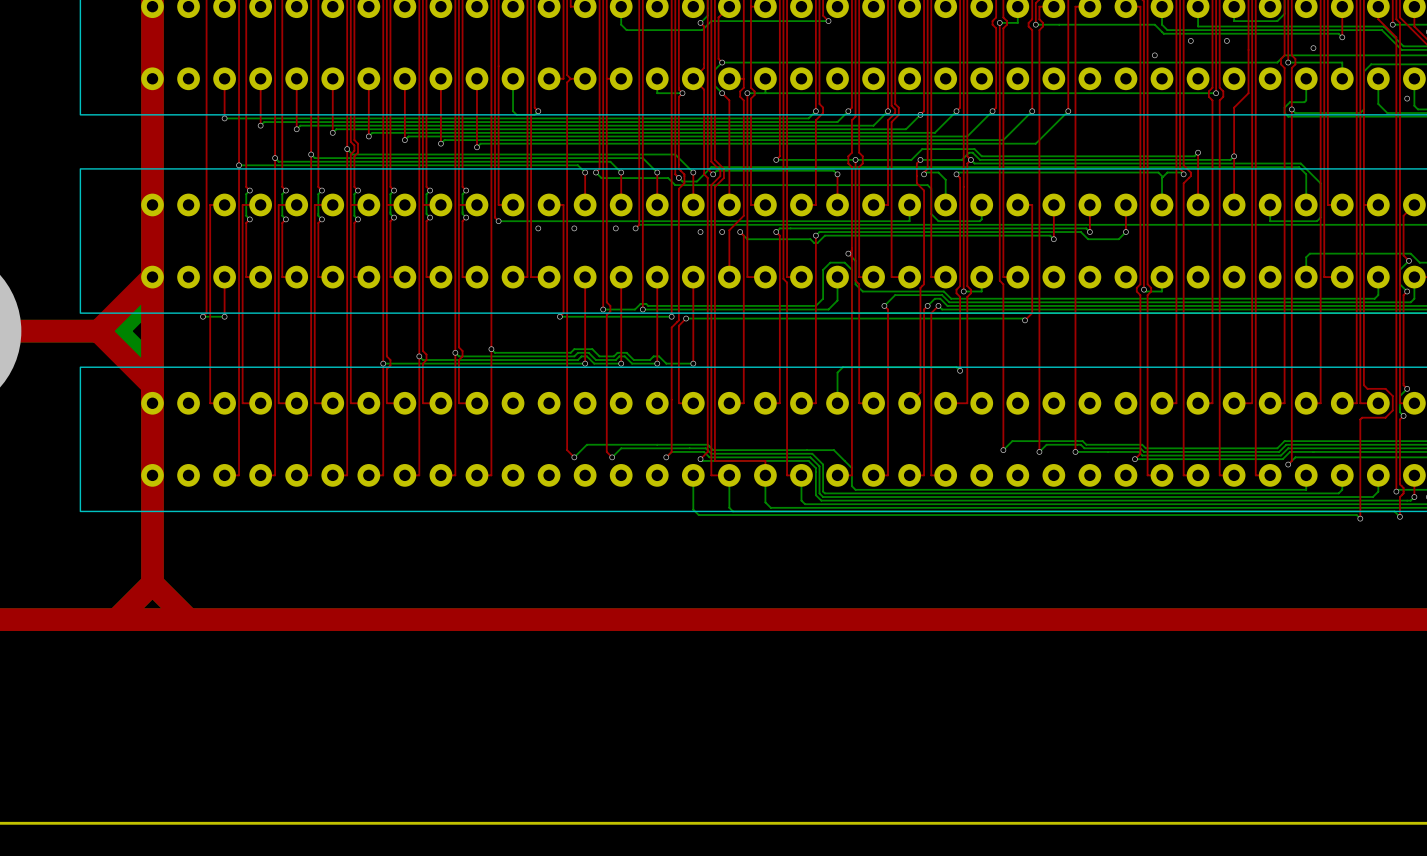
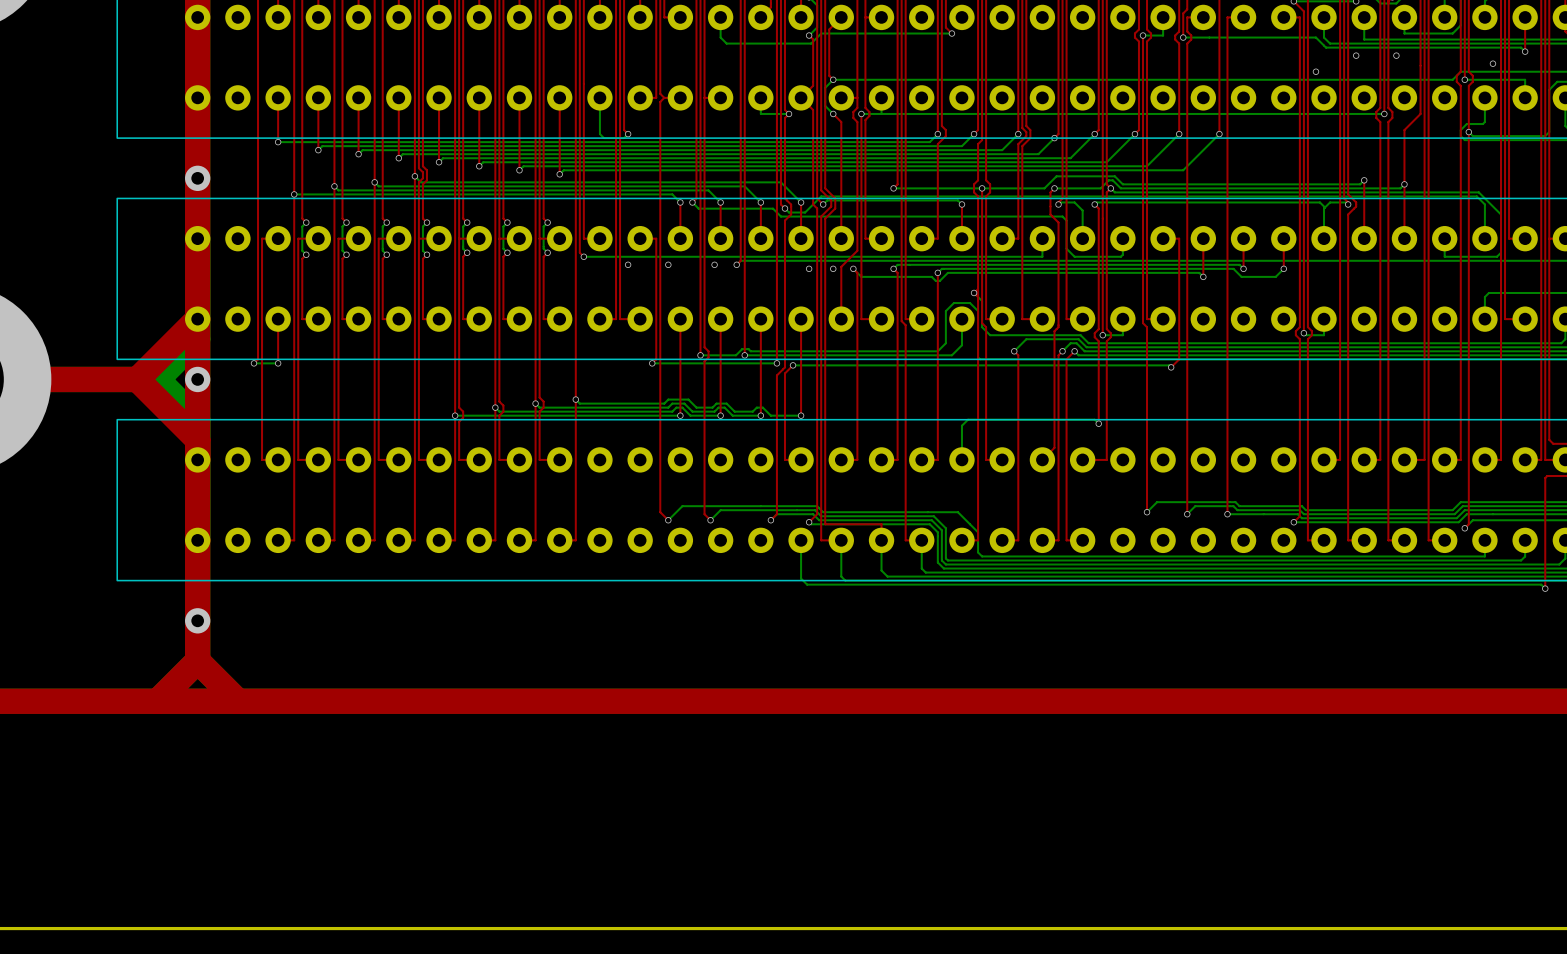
via: none -> (197, 178)
via: none -> (197, 379)
via: none -> (197, 620)

